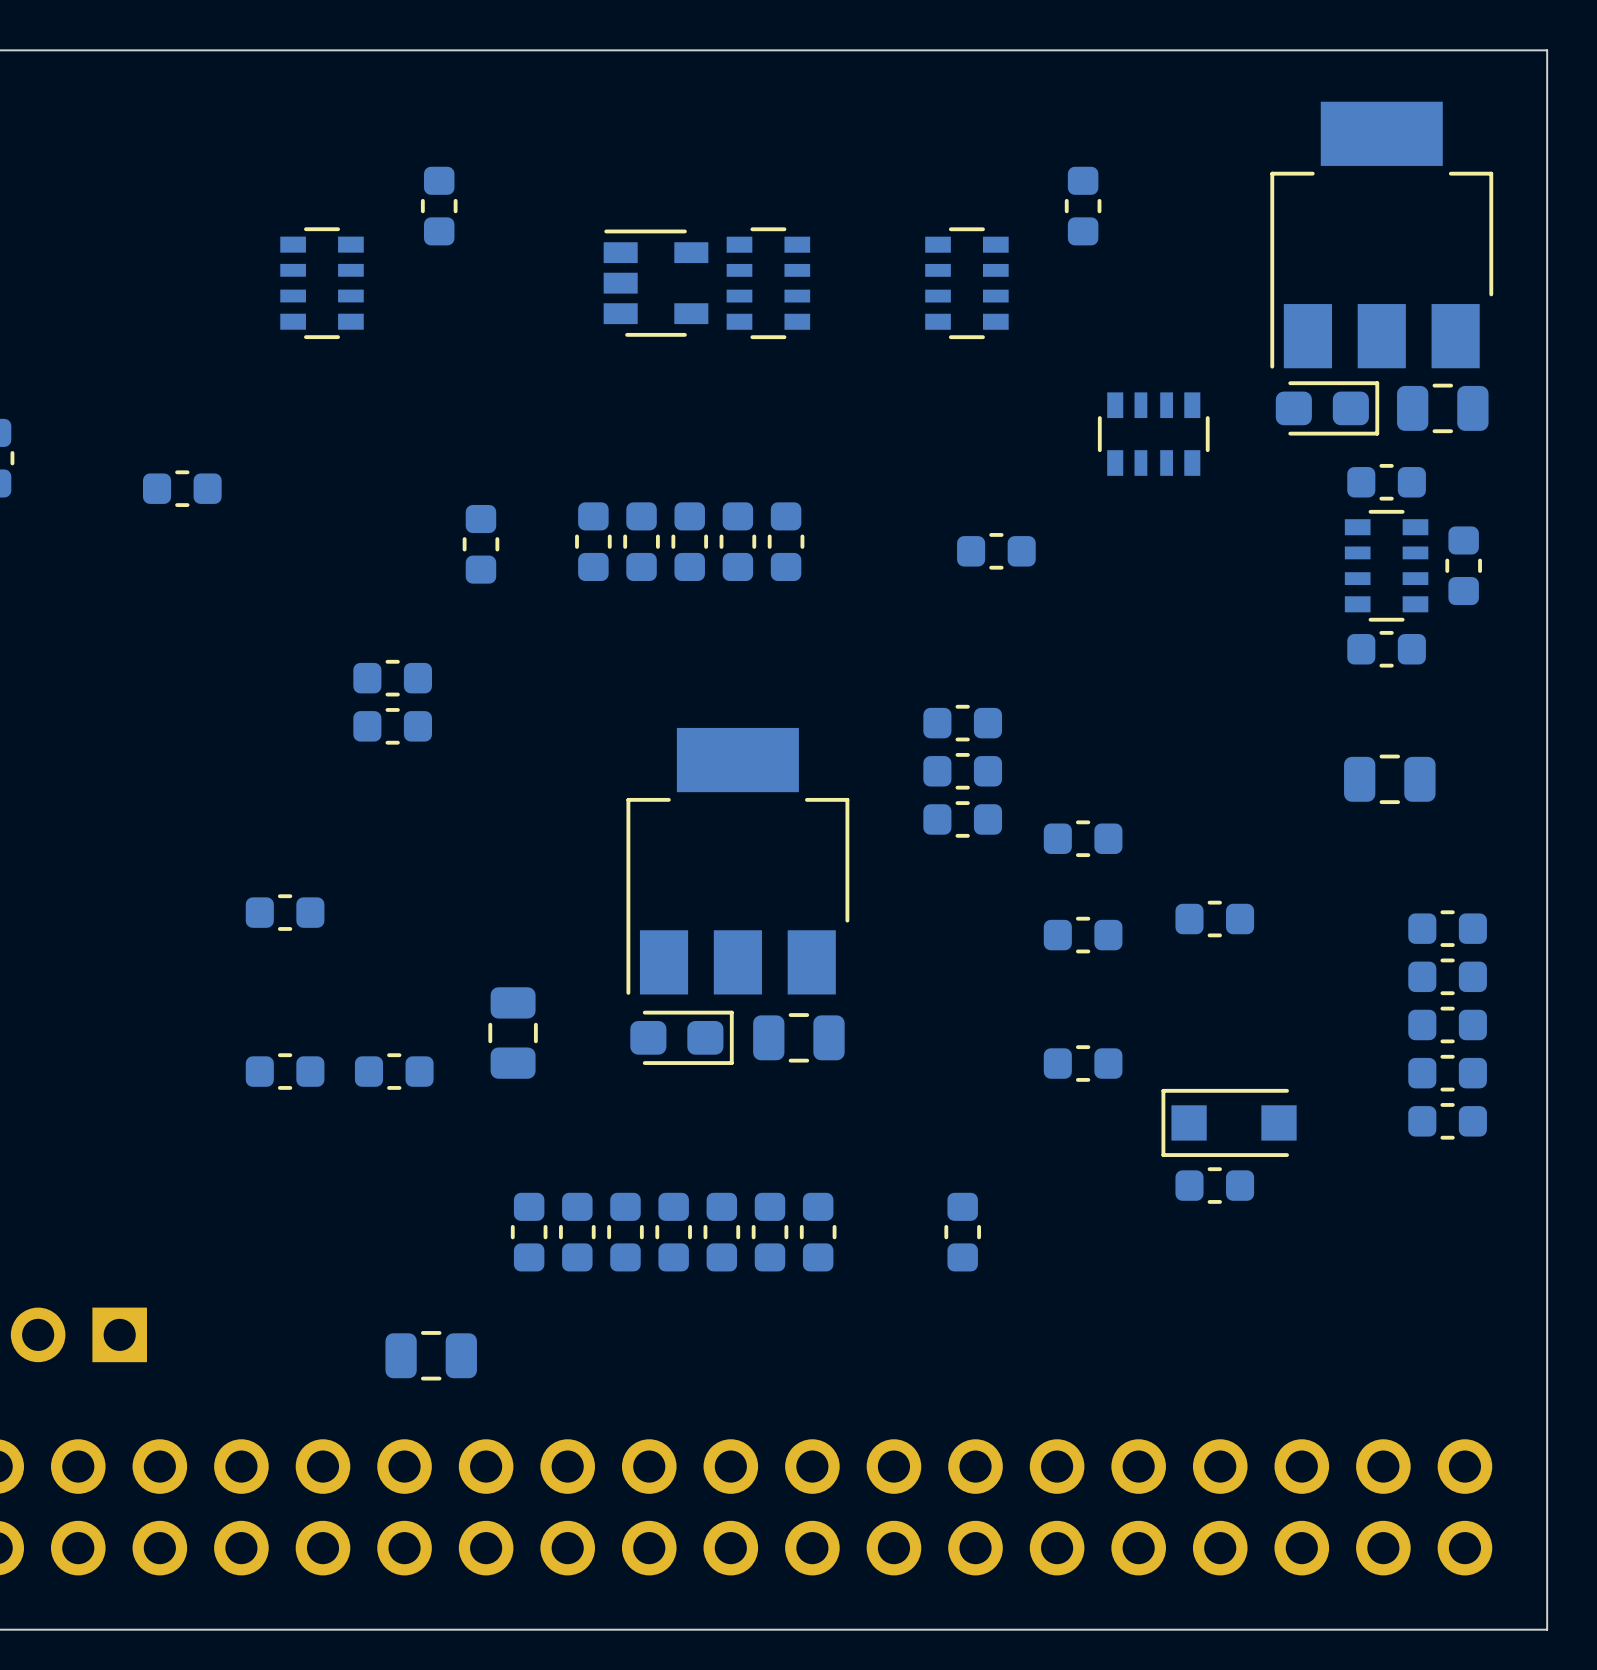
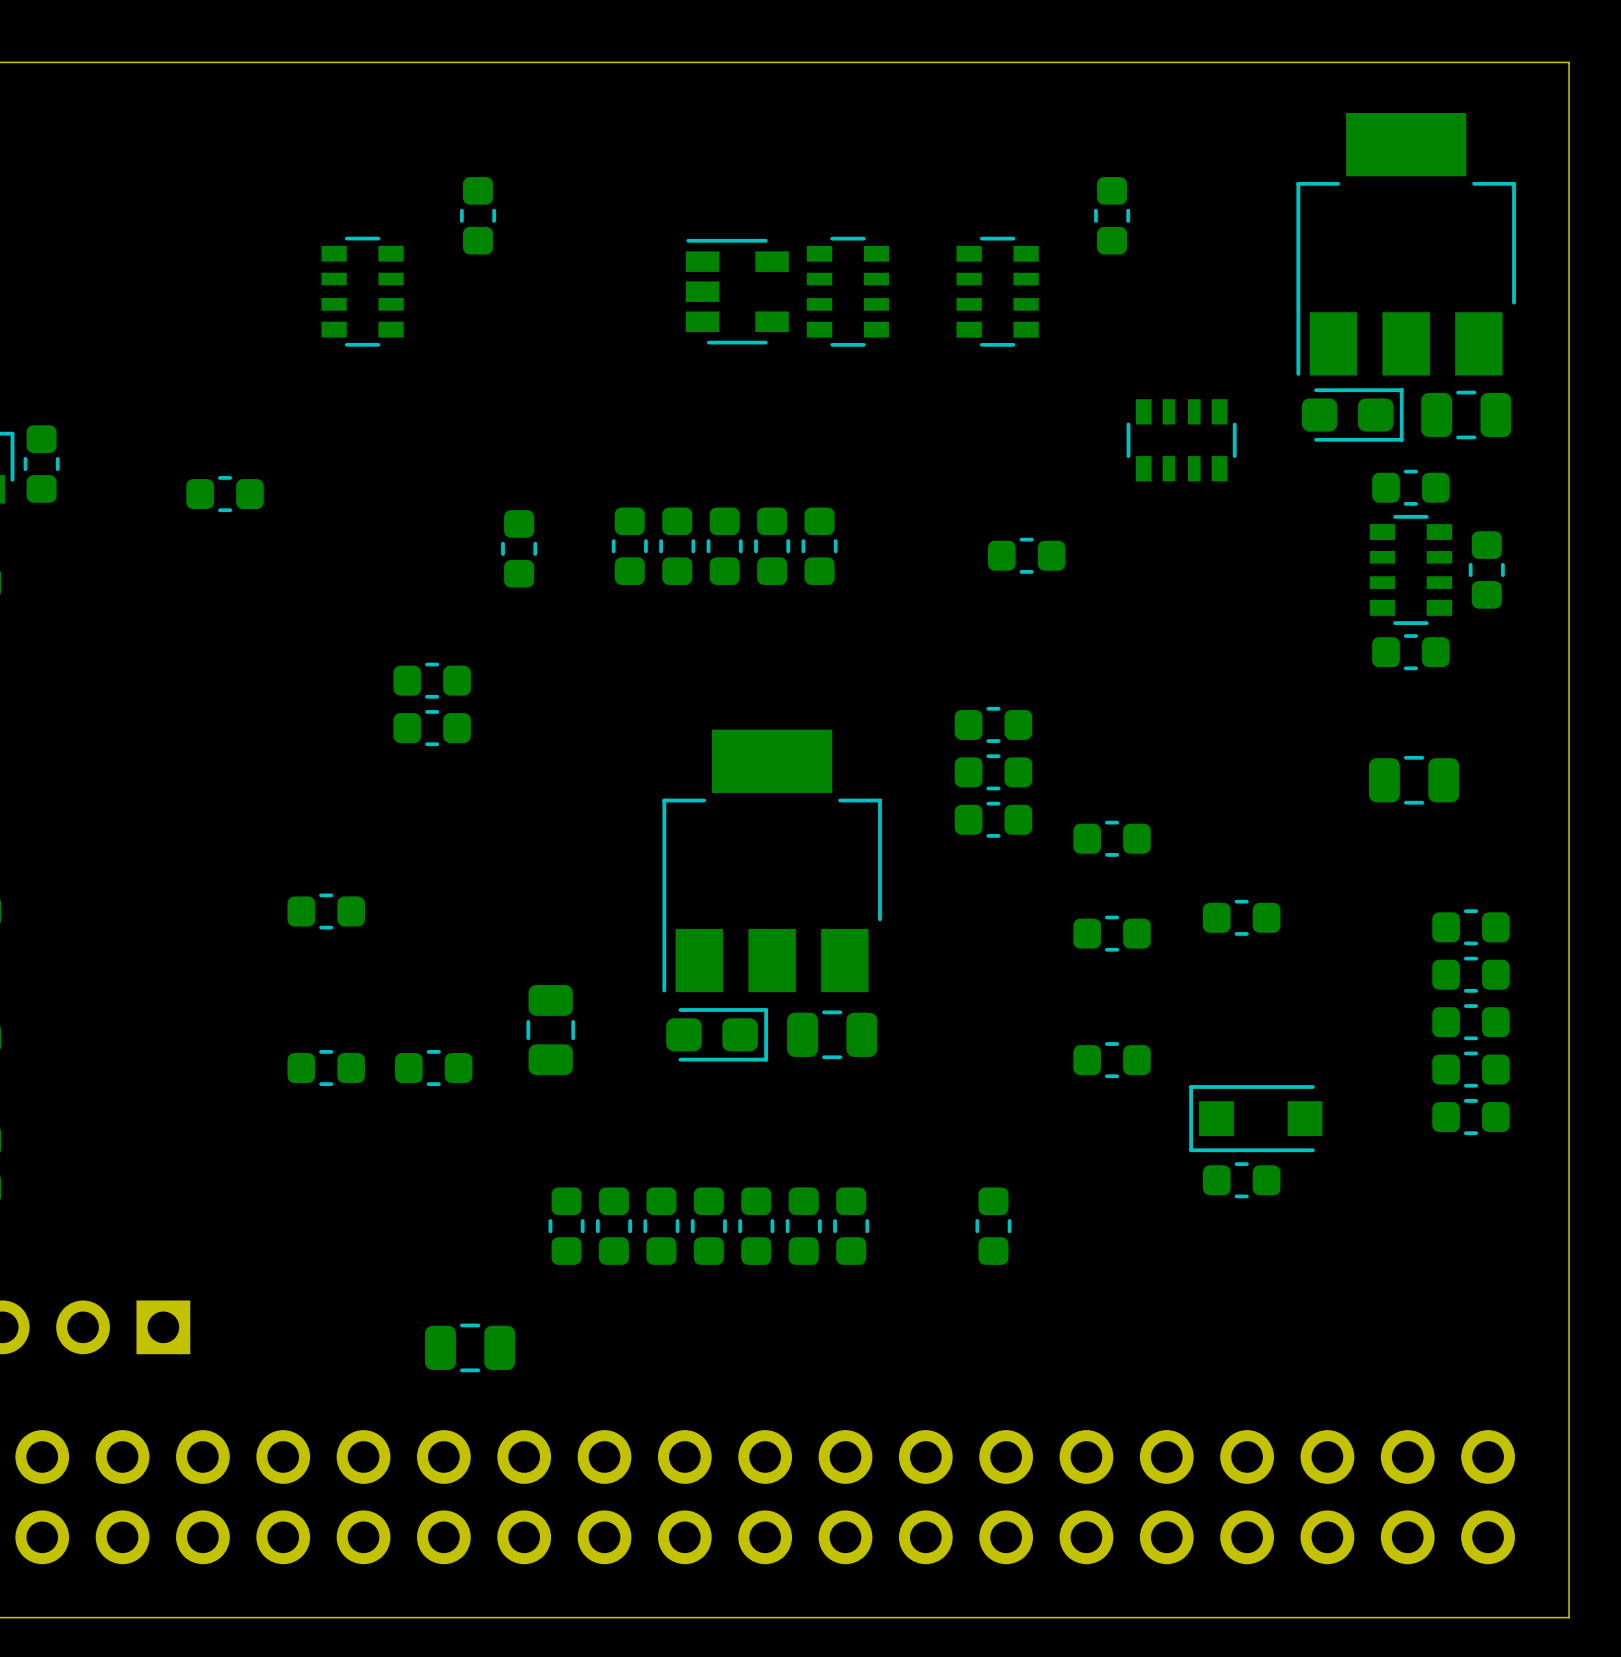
part position: (656, 283) -> (737, 291)
part position: (768, 283) -> (848, 291)

